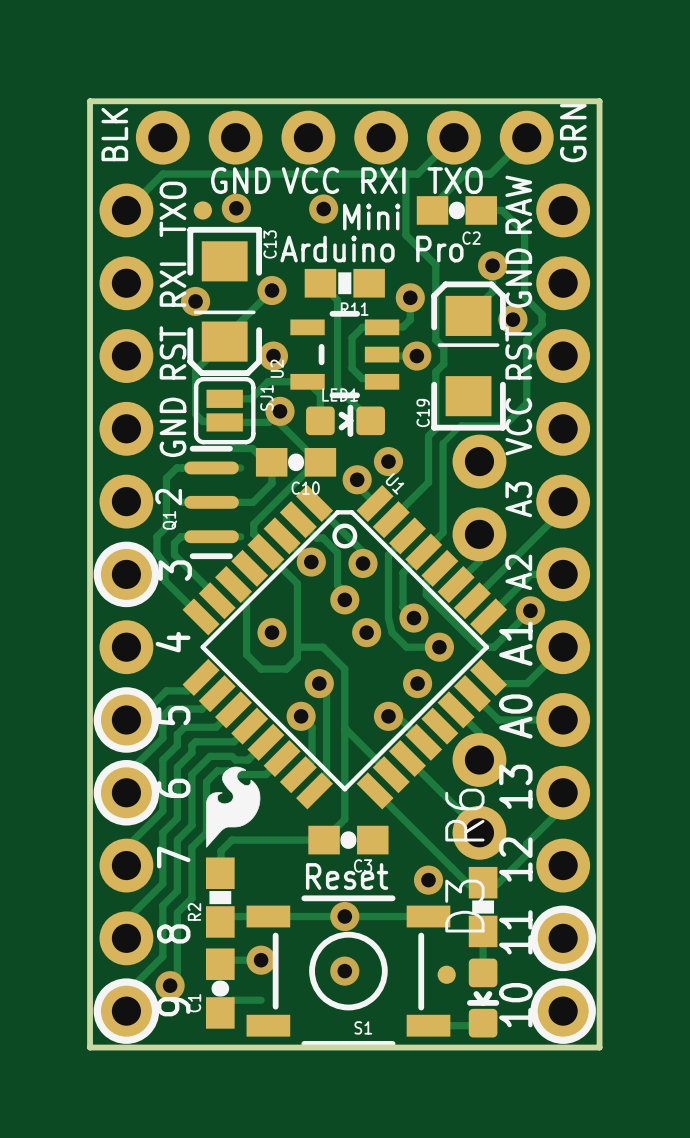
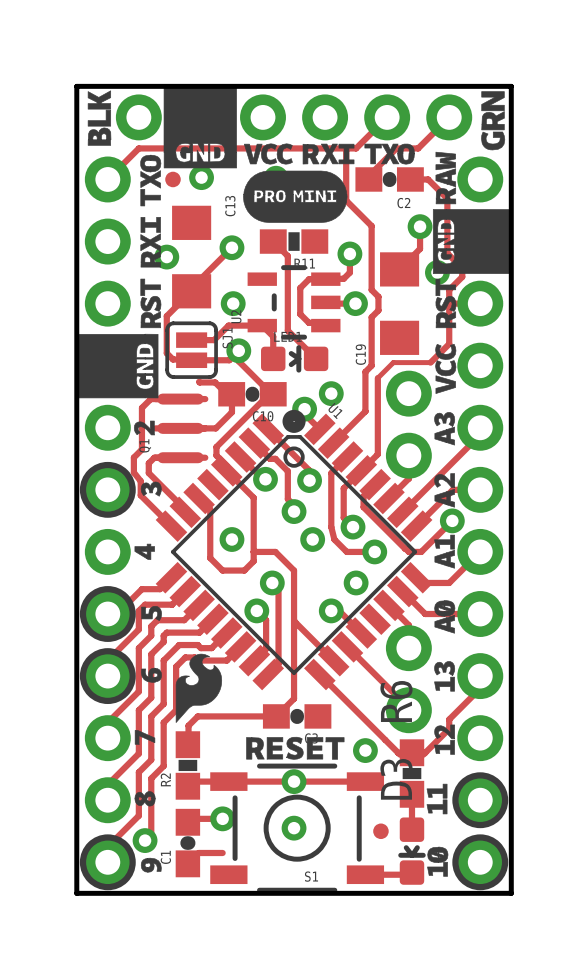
drawing: none -> [76, 85, 513, 569]
drawing: none -> [87, 90, 112, 146]
text: GRN (573, 133) -> none
text: BLK (114, 134) -> none
text: GND (240, 180) -> none
text: VCC (310, 180) -> none
text: RXI (383, 180) -> none
text: TXO (455, 180) -> none
text: RAW (518, 204) -> none
text: TXO (173, 209) -> none
text: Mini (371, 217) -> none
C13 footprint: [187, 226, 263, 377] -> [172, 205, 212, 309]
text: Arduino Pro (371, 249) -> none
text: GND (518, 278) -> none
C19 footprint: [431, 281, 506, 431] -> [380, 252, 420, 355]
text: RXI (173, 284) -> none
text: RST (173, 352) -> none
text: RST (518, 352) -> none
text: VCC (518, 426) -> none
text: GND (173, 427) -> none
Q1 footprint: [178, 445, 245, 560] -> [152, 393, 209, 464]
drawing: none -> [282, 409, 306, 433]
text: 2 (168, 497) -> none
text: A3 (518, 499) -> none
drawing: none -> [140, 481, 162, 497]
text: 3 (175, 570) -> none
text: A2 (518, 572) -> none
drawing: none -> [134, 543, 155, 560]
text: 4 (173, 642) -> none
text: A1 (515, 643) -> none
drawing: none -> [434, 600, 456, 692]
drawing: none -> [141, 606, 162, 621]
text: 5 (173, 715) -> none
text: A0 (515, 716) -> none
drawing: none -> [140, 667, 162, 683]
text: 13 (515, 786) -> none
text: 6 (173, 788) -> none
drawing: none -> [426, 724, 455, 815]
drawing: none -> [134, 730, 156, 745]
text: 7 (173, 857) -> none
text: 12 (515, 859) -> none
drawing: none -> [246, 736, 345, 760]
text: Reset (347, 876) -> none
drawing: none -> [134, 791, 156, 807]
text: 11 (515, 932) -> none
text: 8 (173, 933) -> none
drawing: none -> [427, 846, 449, 877]
drawing: none -> [140, 857, 162, 873]
text: 10 (515, 1005) -> none
text: 9 (173, 1006) -> none

